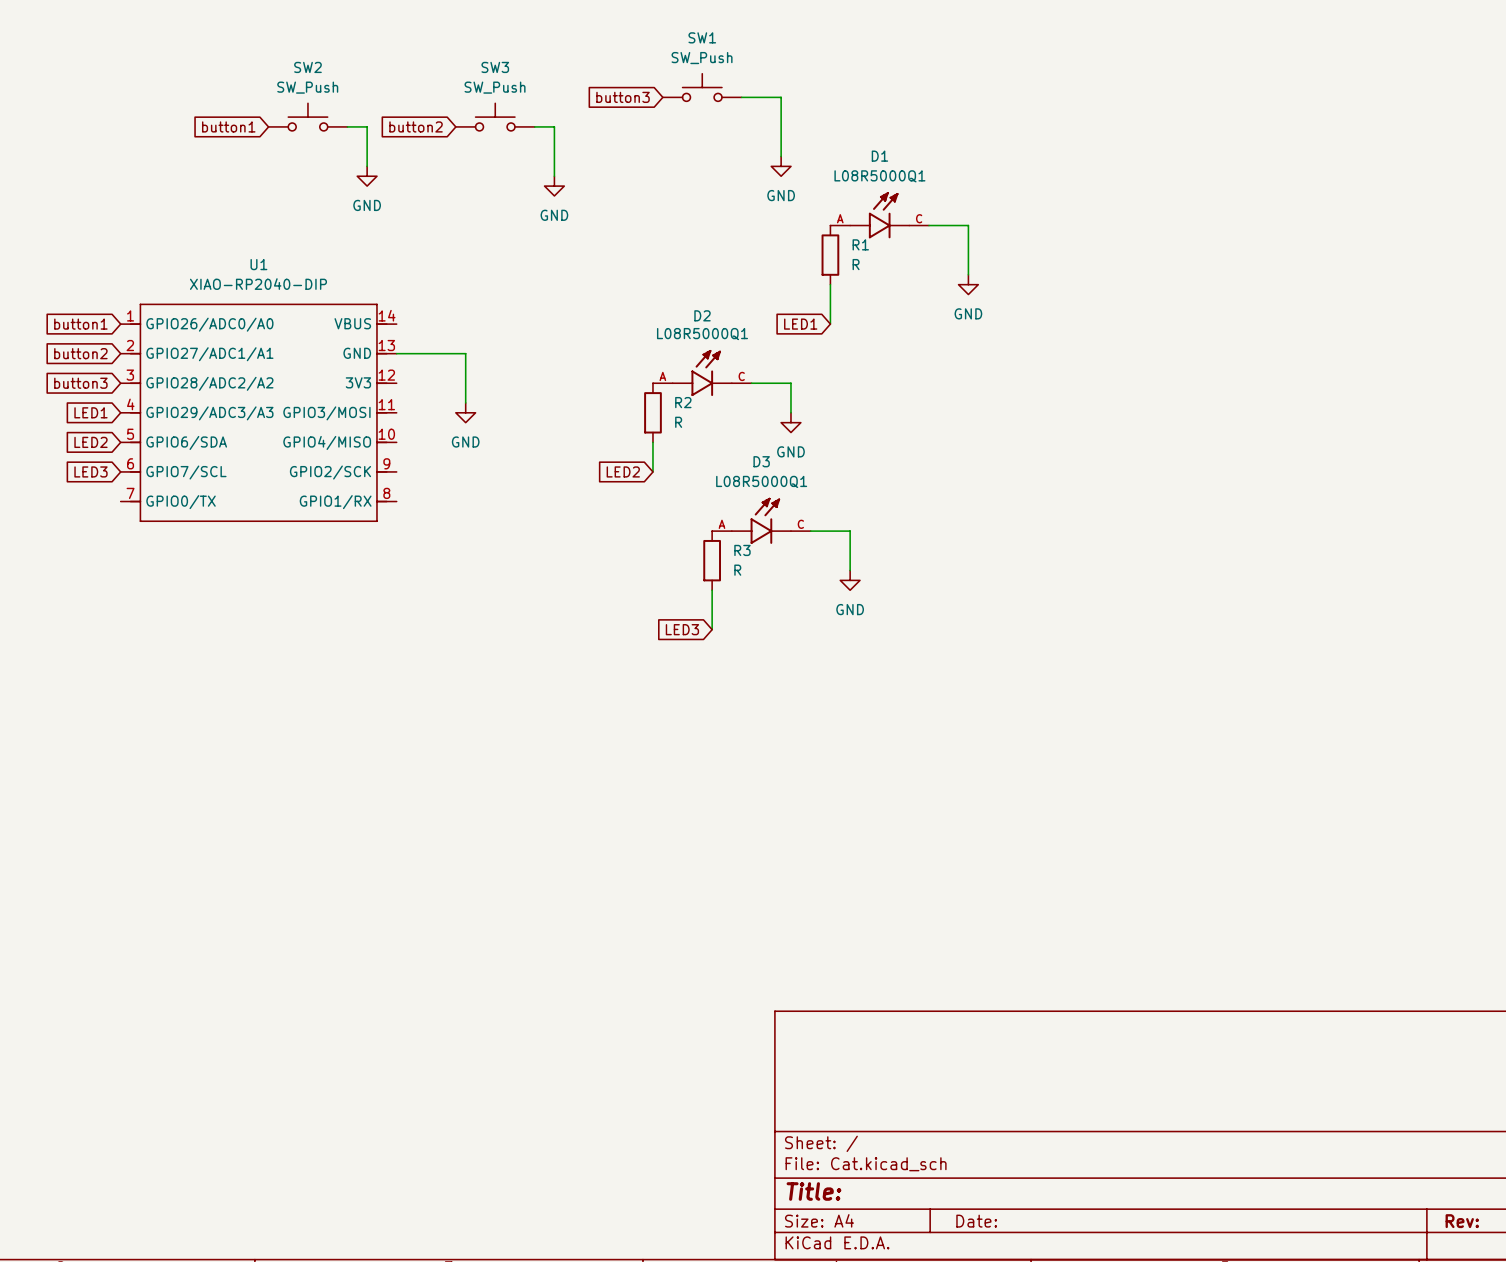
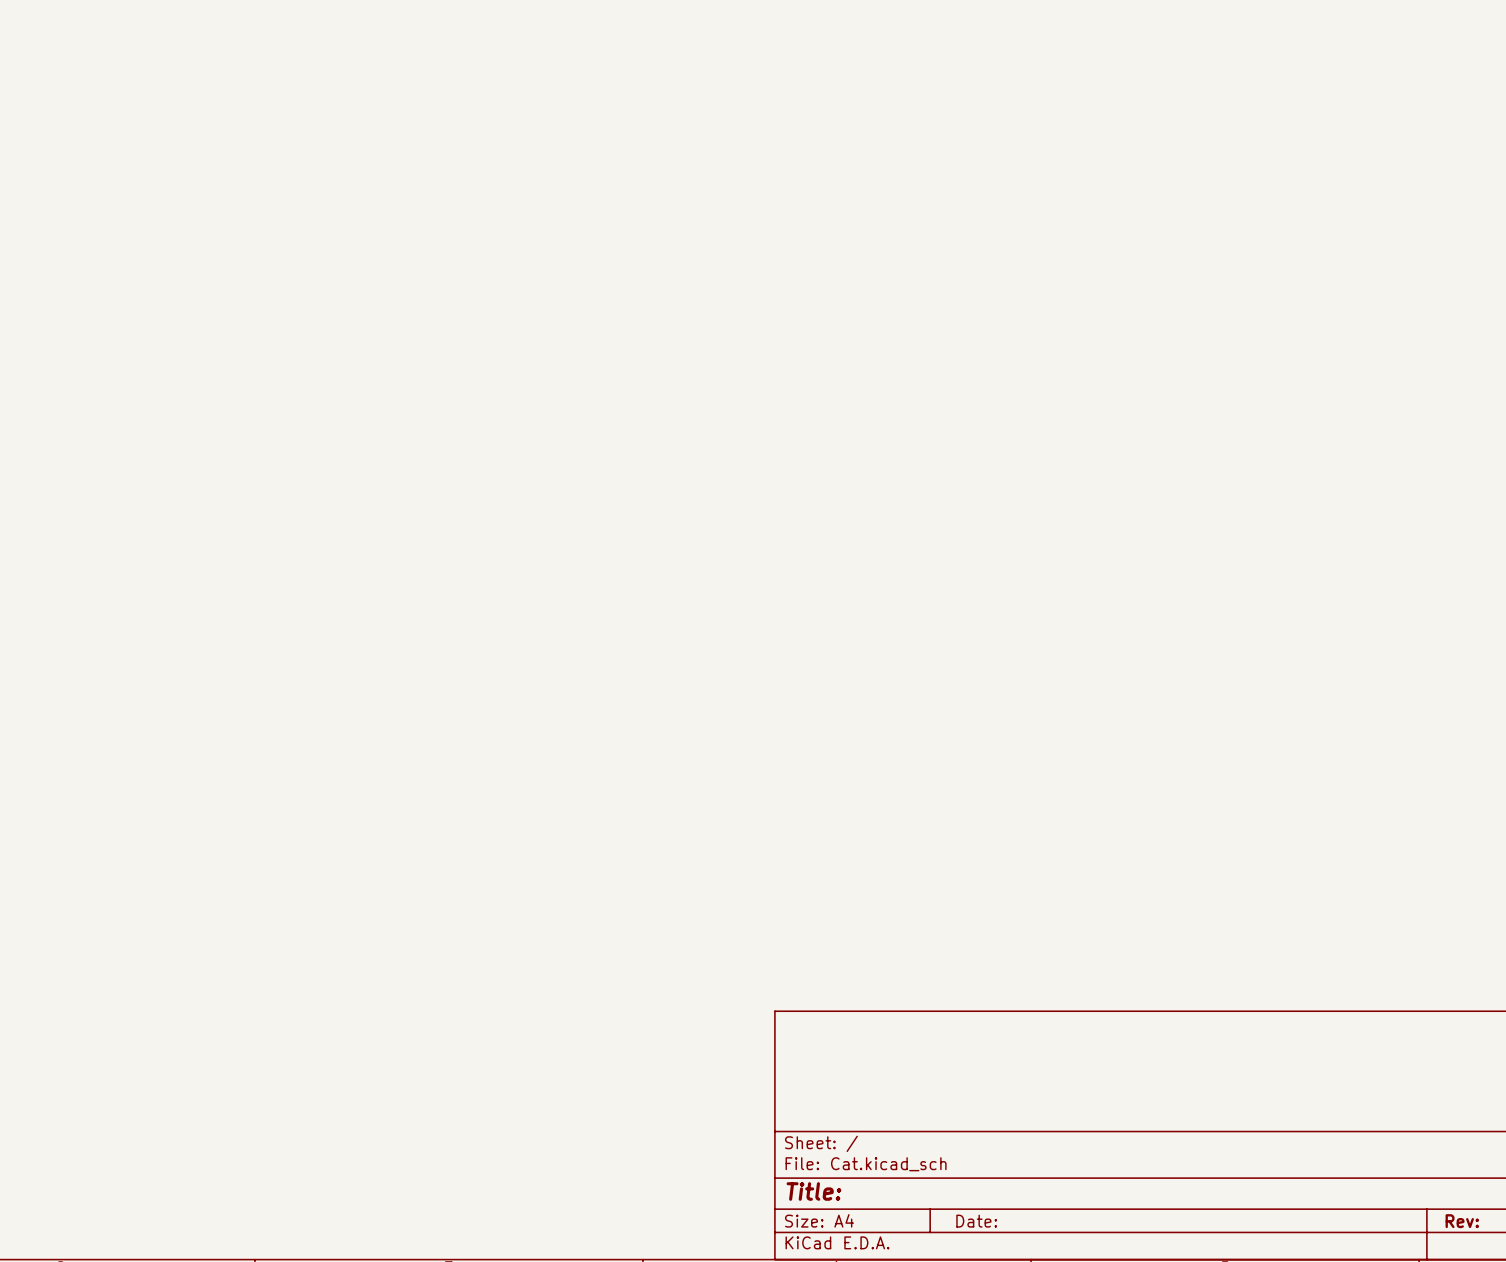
SW1: SW_Push (702, 87) -> none
global label: button3 (623, 97) -> none
wire: (741, 97) (781, 97) (781, 156) -> none
SW2: SW_Push (307, 117) -> none
SW3: SW_Push (495, 117) -> none
global label: button1 (228, 126) -> none
wire: (347, 126) (367, 126) (367, 166) -> none
global label: button2 (416, 126) -> none
wire: (534, 126) (554, 126) (554, 176) -> none
power symbol: GND (781, 166) -> none
power symbol: GND (367, 176) -> none
power symbol: GND (554, 186) -> none
D1: L08R5000Q1 (879, 215) -> none
wire: (928, 225) (968, 225) (968, 274) -> none
R1: R (830, 255) -> none
wire: (830, 284) (830, 324) -> none
power symbol: GND (968, 284) -> none
global label: button1 (80, 324) -> none
global label: LED1 (800, 324) -> none
global label: button2 (80, 353) -> none
wire: (396, 353) (465, 353) (465, 402) -> none
D2: L08R5000Q1 (702, 372) -> none
global label: button3 (80, 383) -> none
wire: (751, 383) (790, 383) (790, 412) -> none
global label: LED1 (90, 412) -> none
U1: XIAO-RP2040-DIP (258, 412) -> none
power symbol: GND (465, 412) -> none
R2: R (652, 412) -> none
power symbol: GND (790, 422) -> none
global label: LED2 (90, 442) -> none
wire: (652, 442) (652, 471) -> none
global label: LED3 (90, 471) -> none
global label: LED2 (623, 471) -> none
D3: L08R5000Q1 (761, 520) -> none
wire: (810, 531) (850, 531) (850, 570) -> none
R3: R (712, 560) -> none
power symbol: GND (850, 580) -> none
wire: (712, 590) (712, 629) -> none
global label: LED3 (682, 629) -> none

